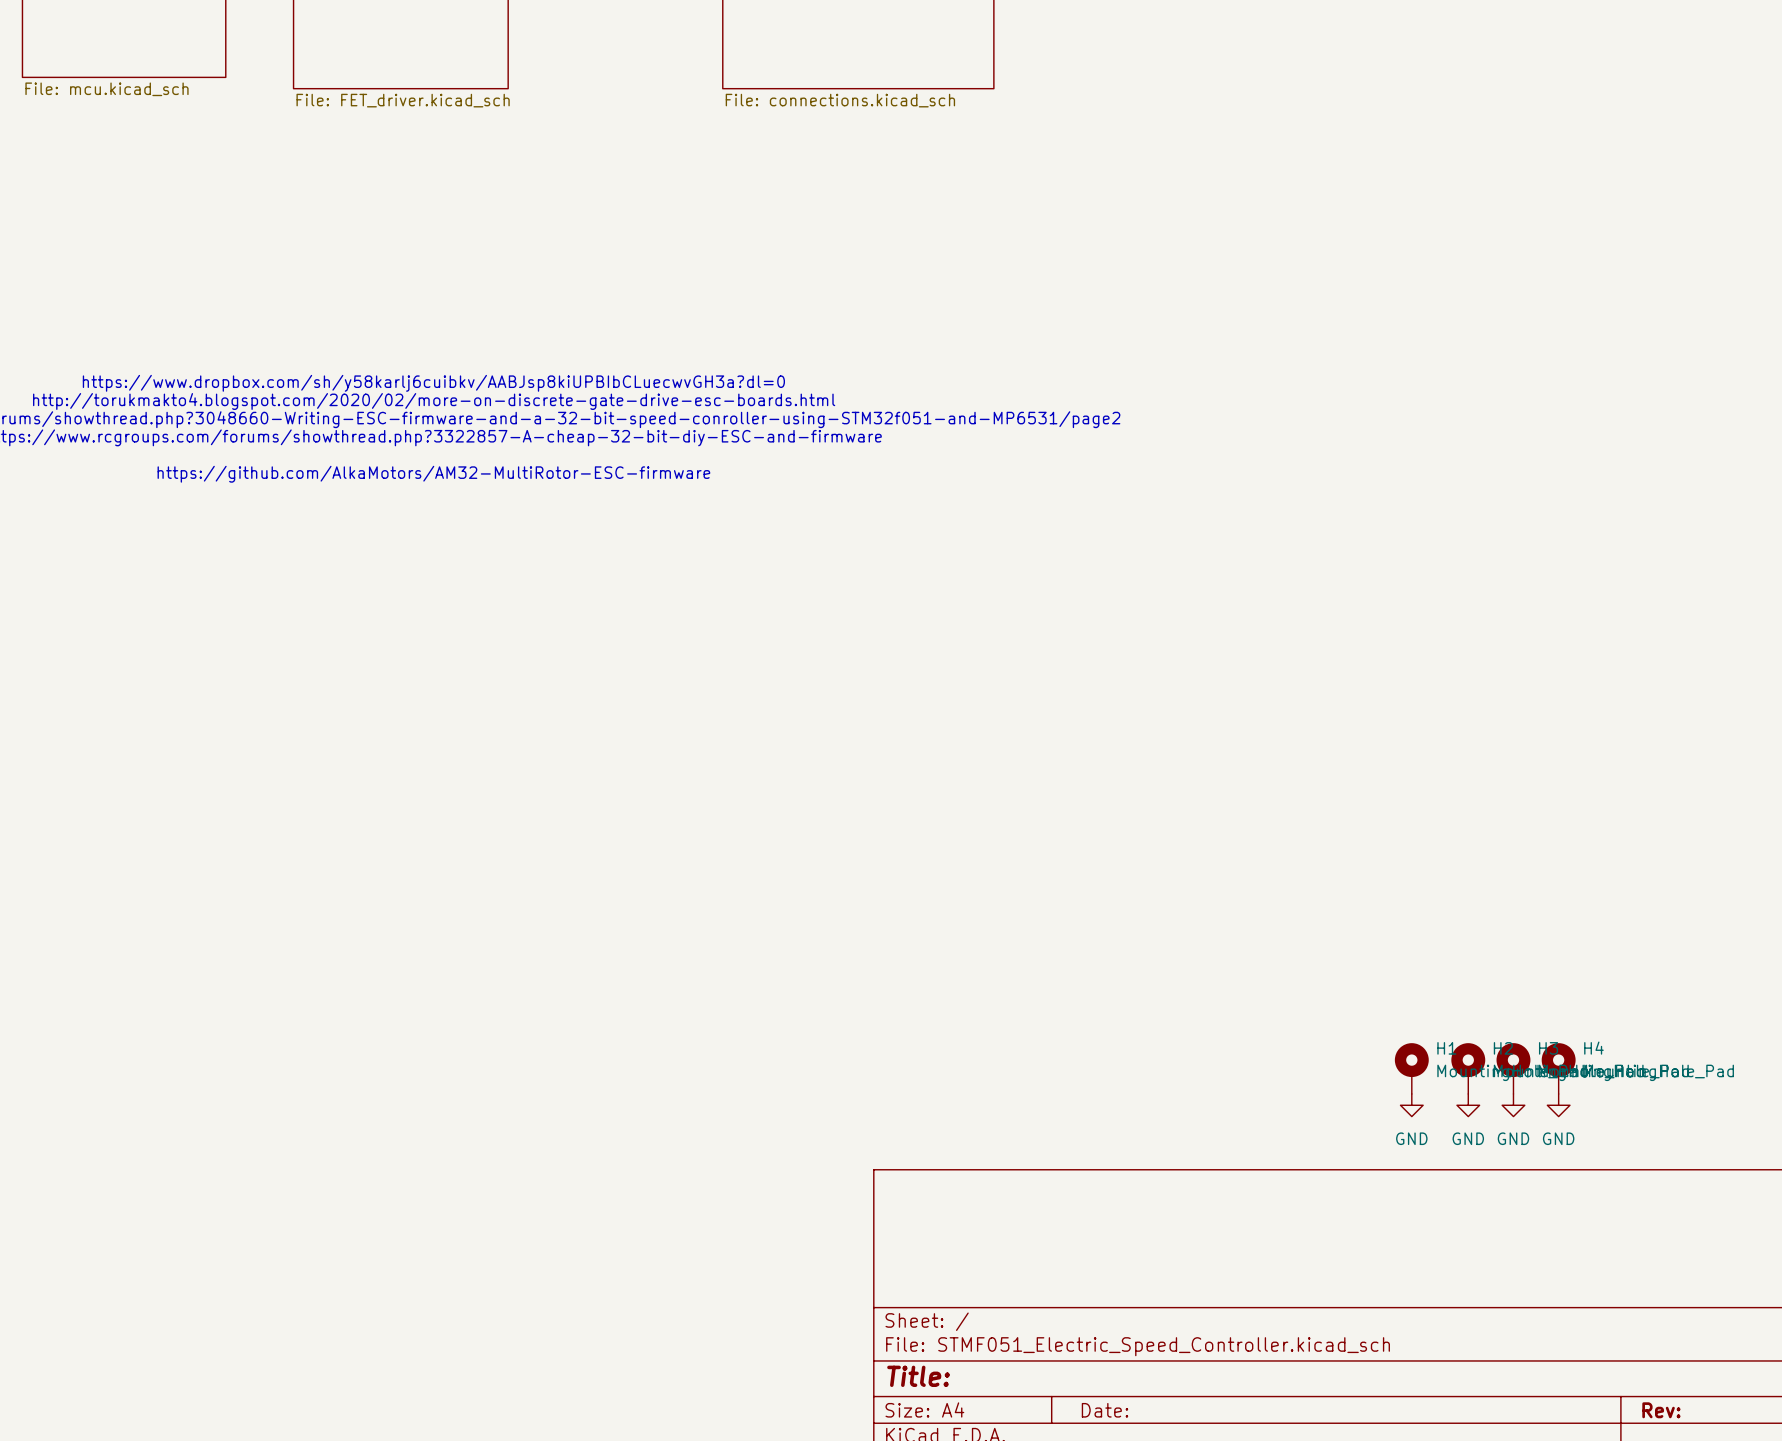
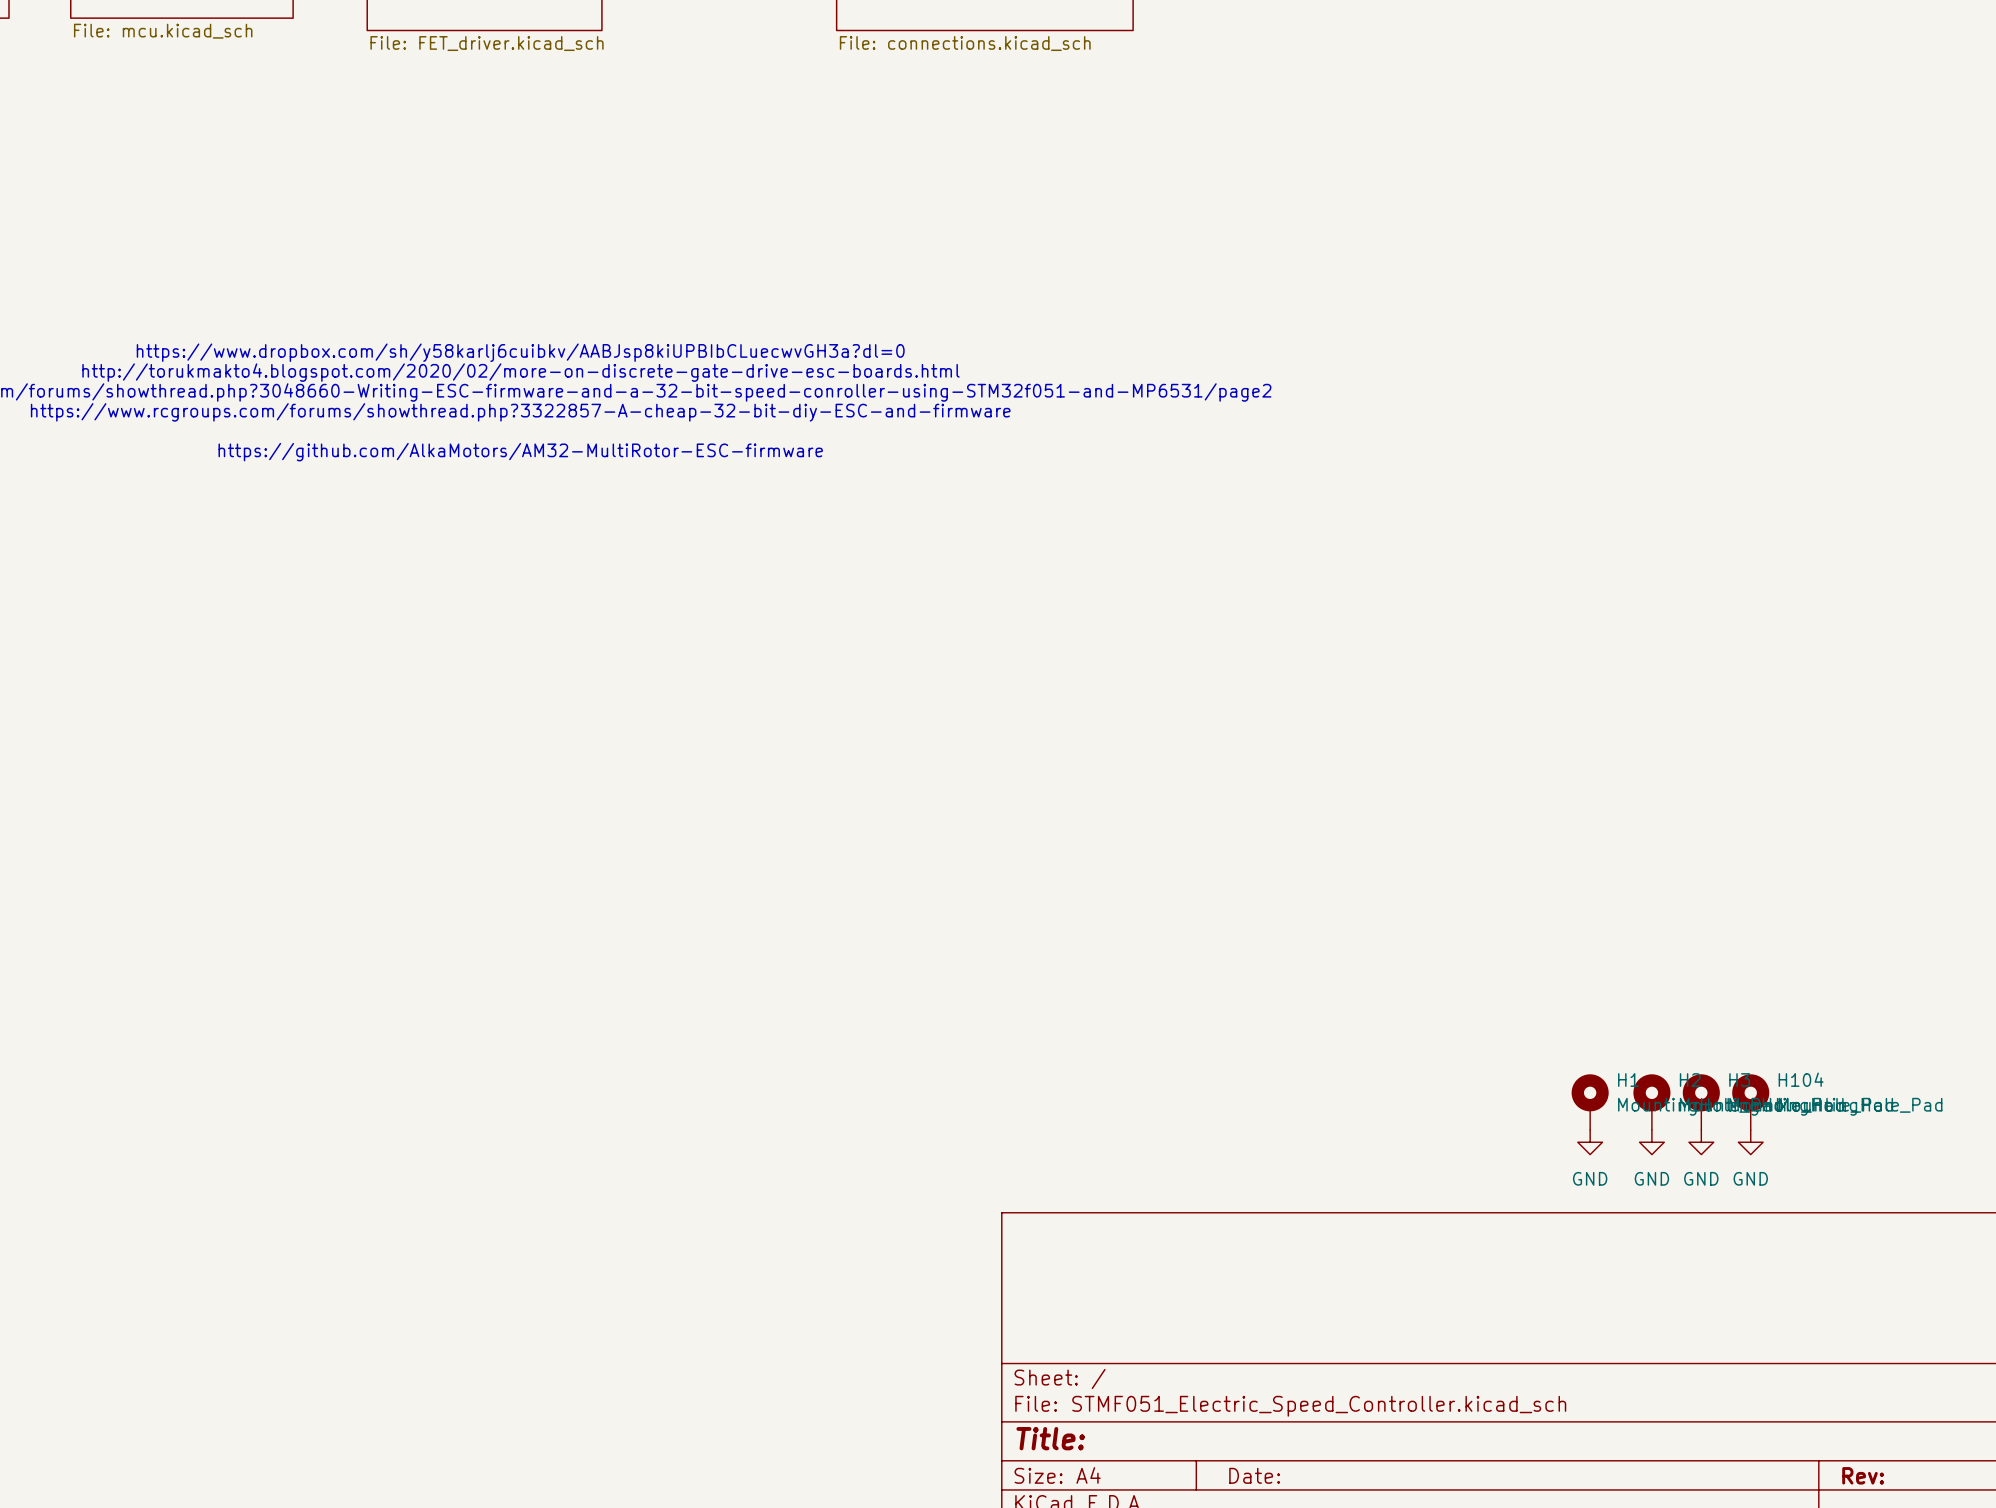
H4 name: H4 (1593, 1048) -> H104 (1801, 1079)

